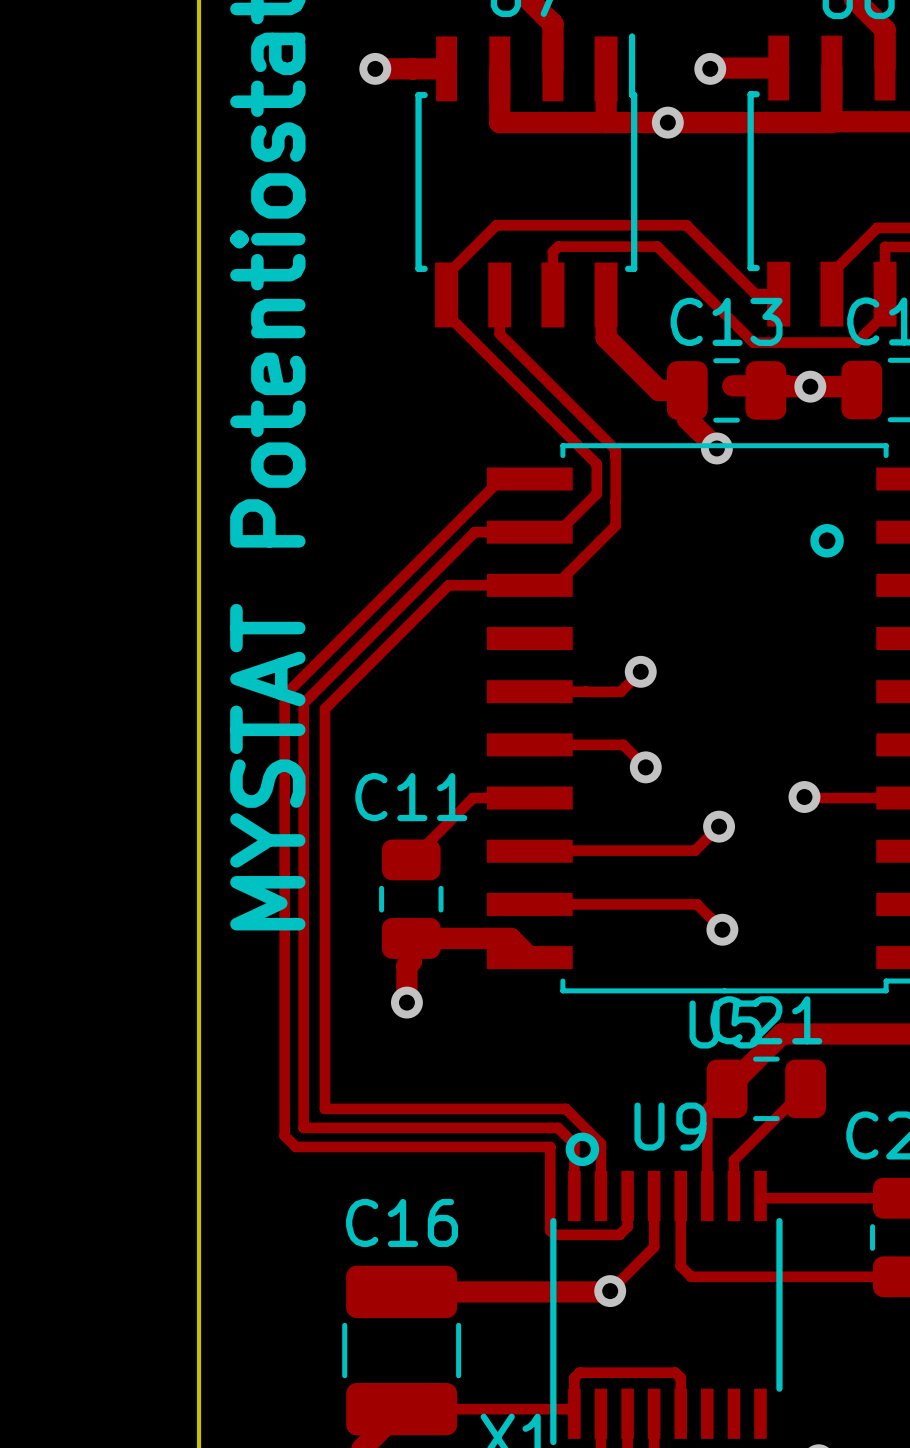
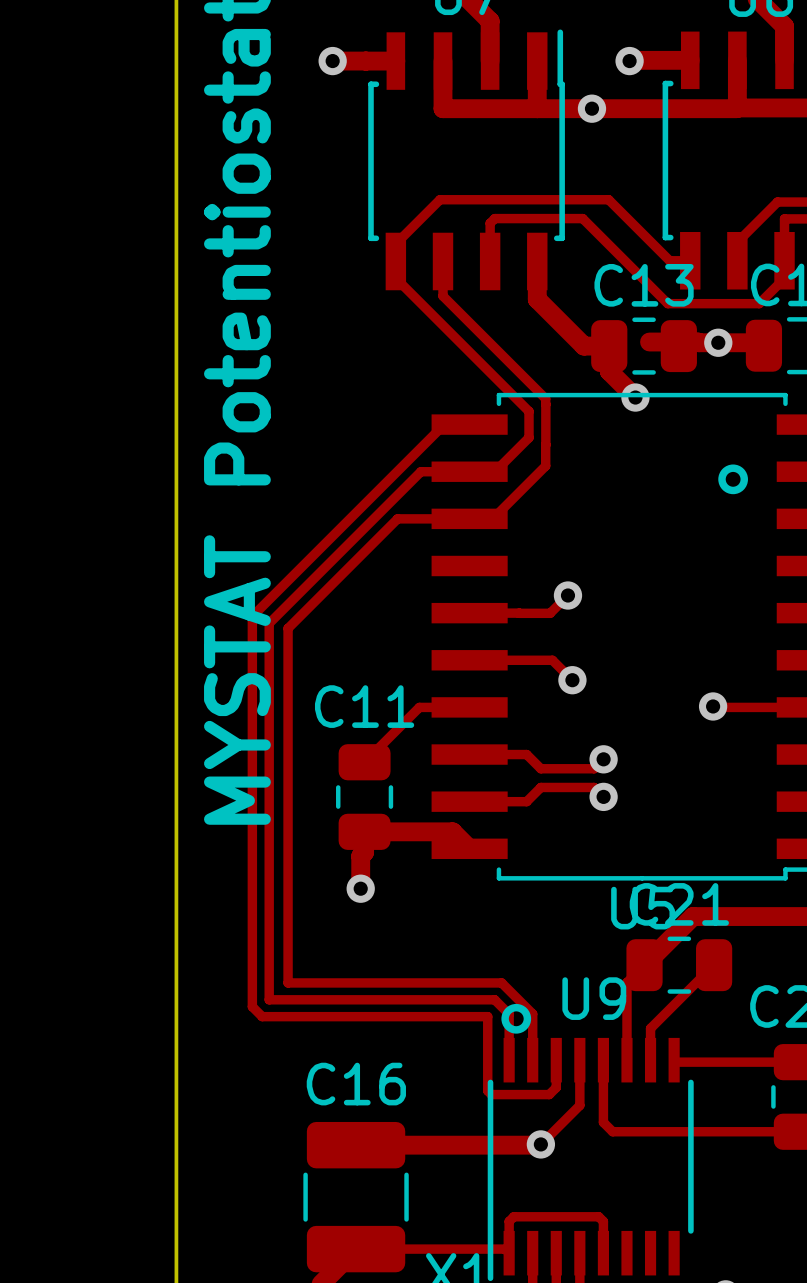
track: (719, 826) (695, 850) (550, 850) -> none
via: (719, 826) -> none
track: none -> (469, 754) (526, 754) (540, 768) (594, 768) (603, 759)
via: none -> (603, 759)
via: none -> (603, 796)
track: (594, 904) (697, 904) (722, 929) -> (526, 801) (540, 787) (594, 787) (603, 796)
via: (722, 929) -> none

